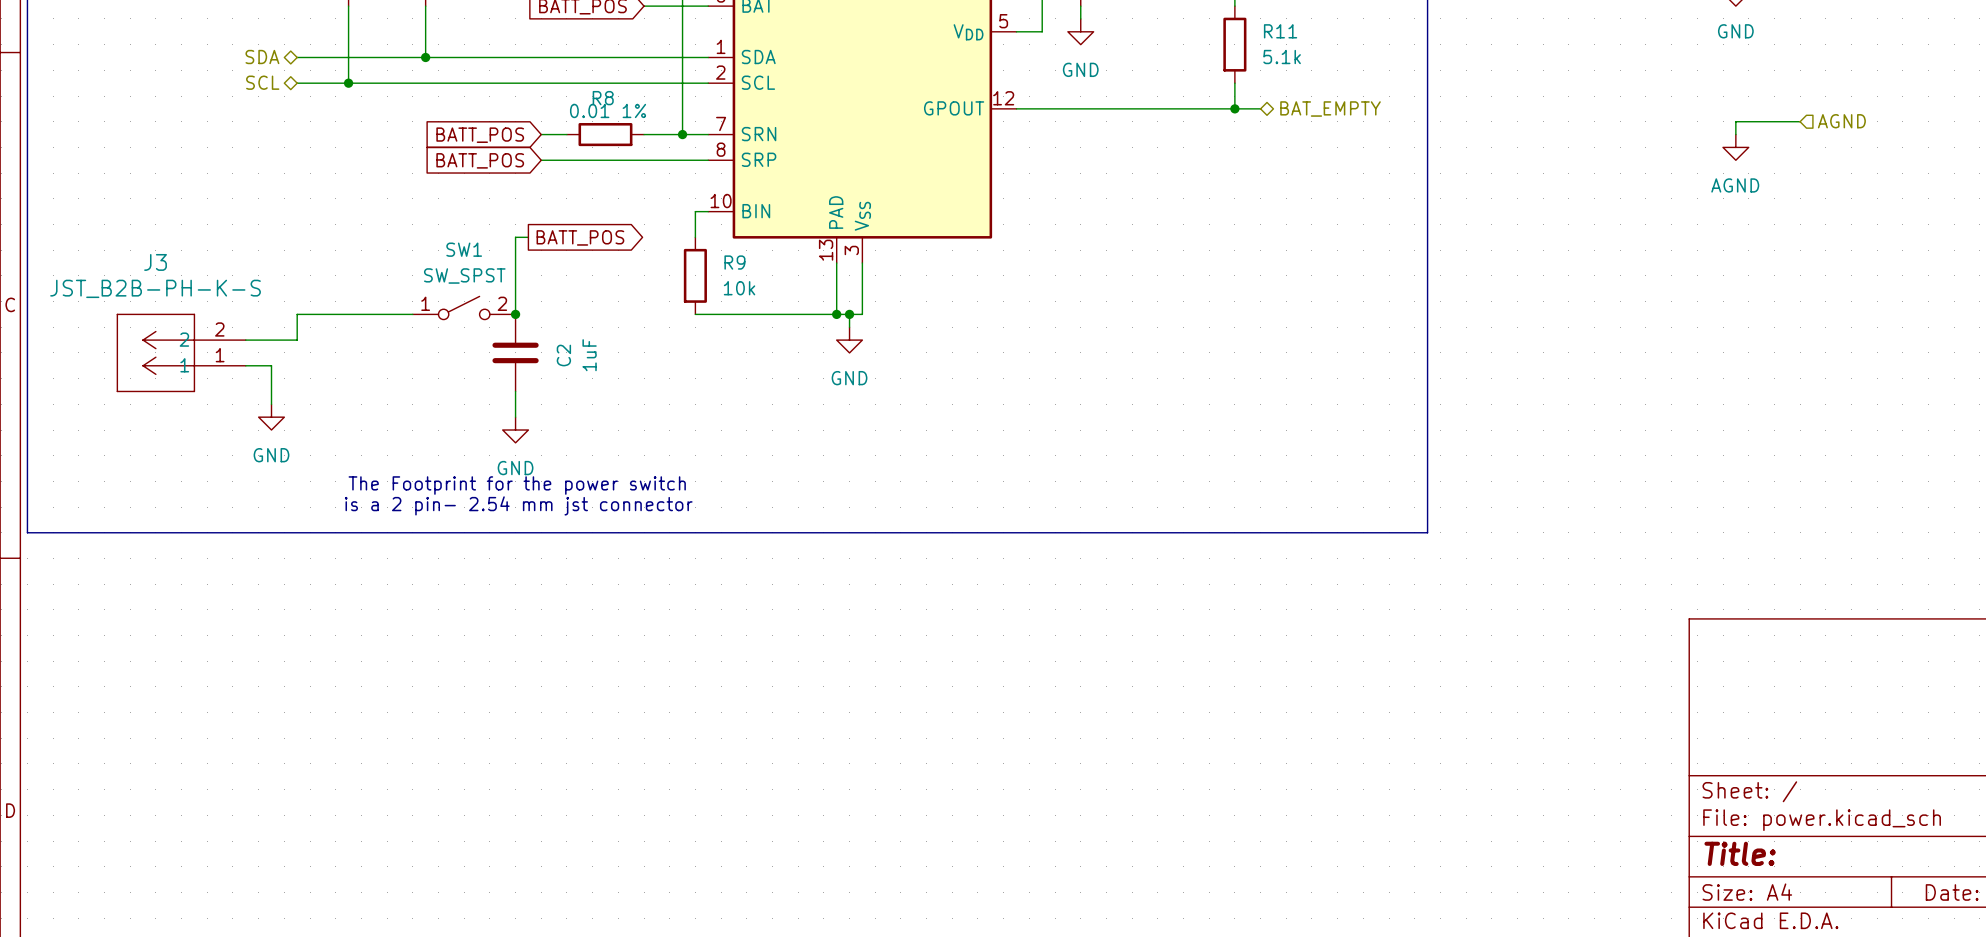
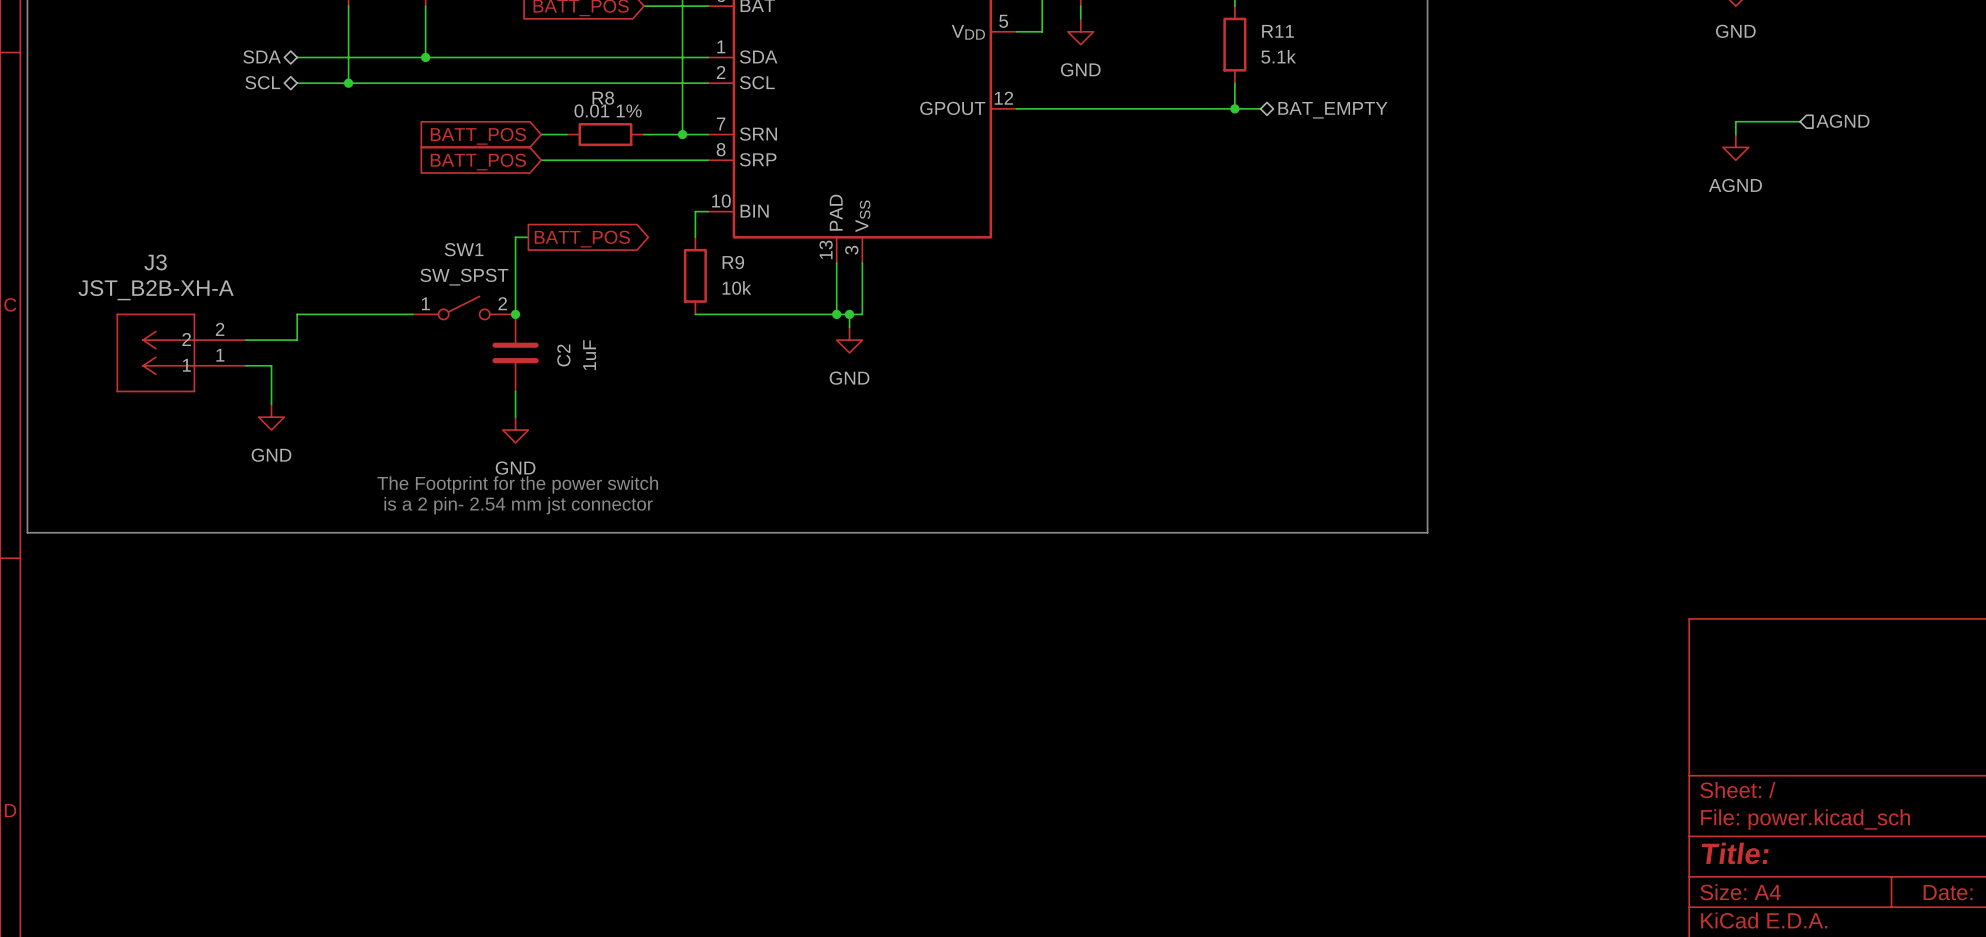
J3 value: JST_B2B-PH-K-S (155, 288) -> JST_B2B-XH-A (156, 290)

